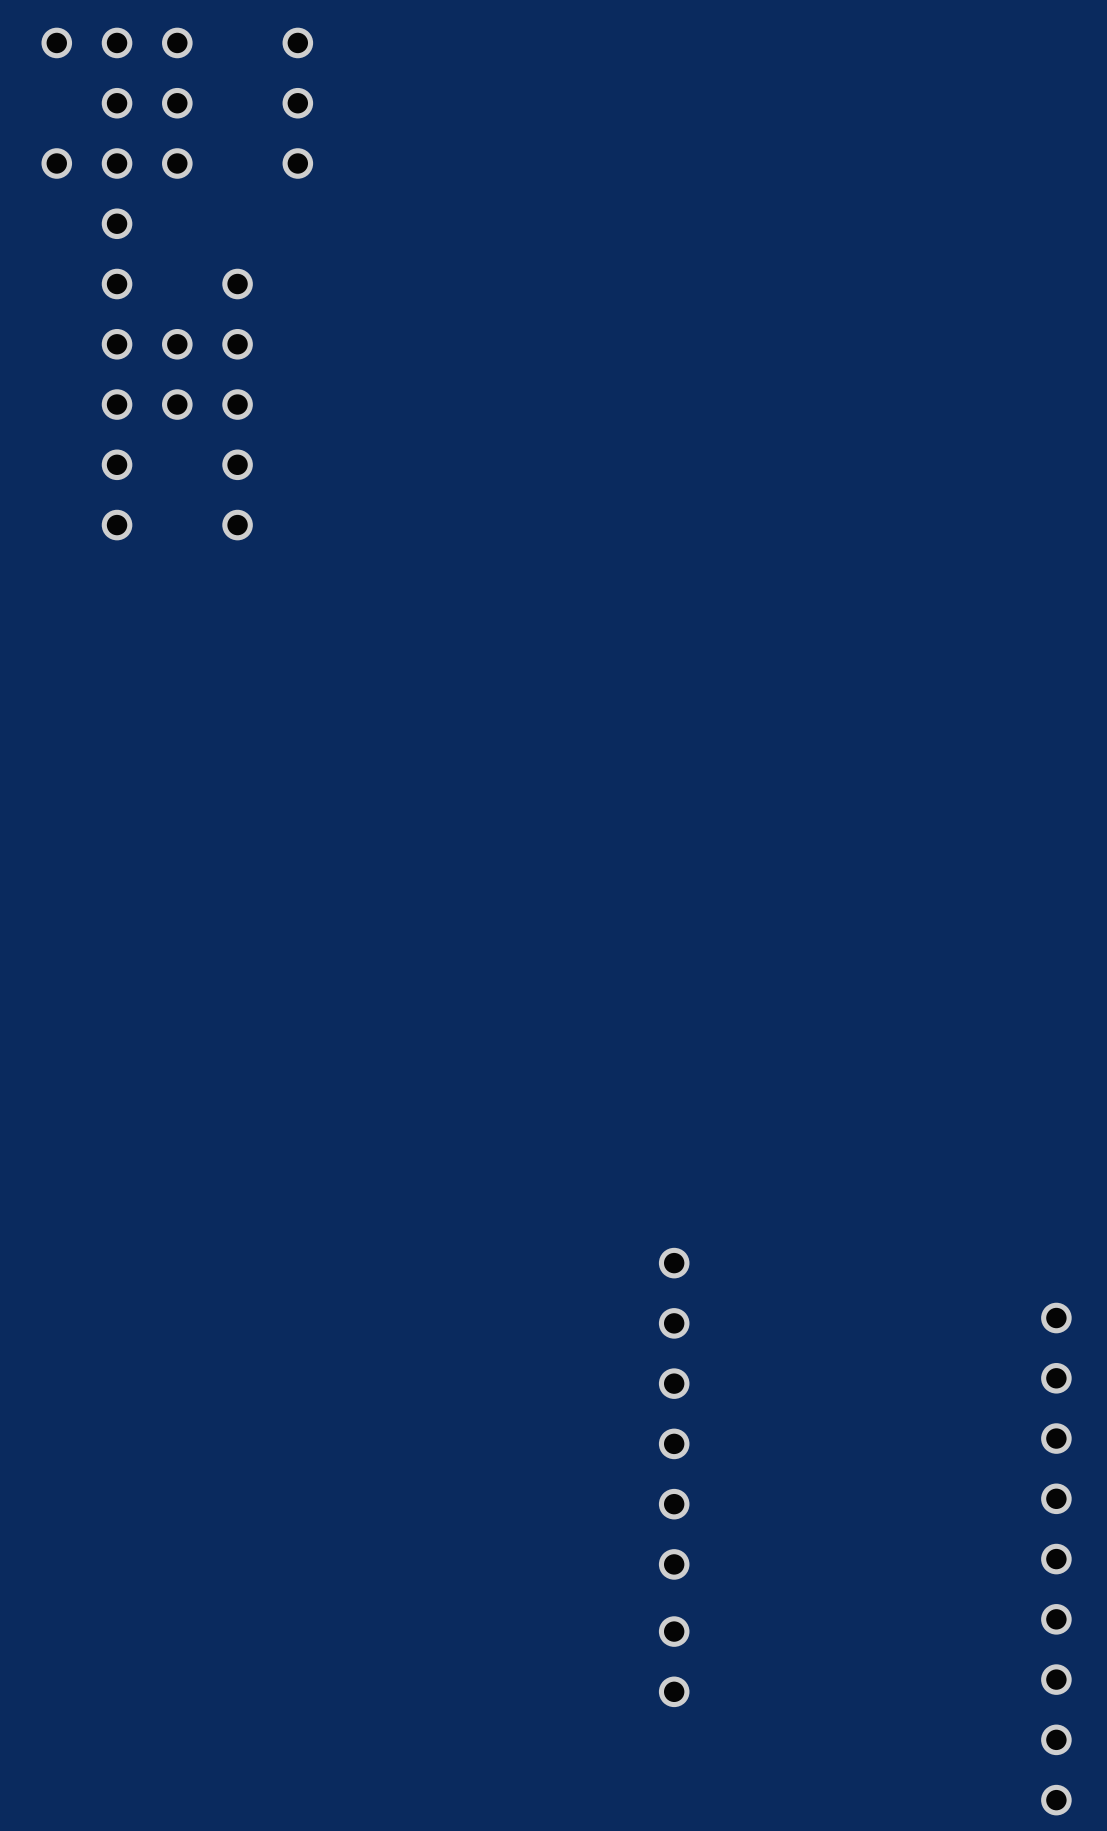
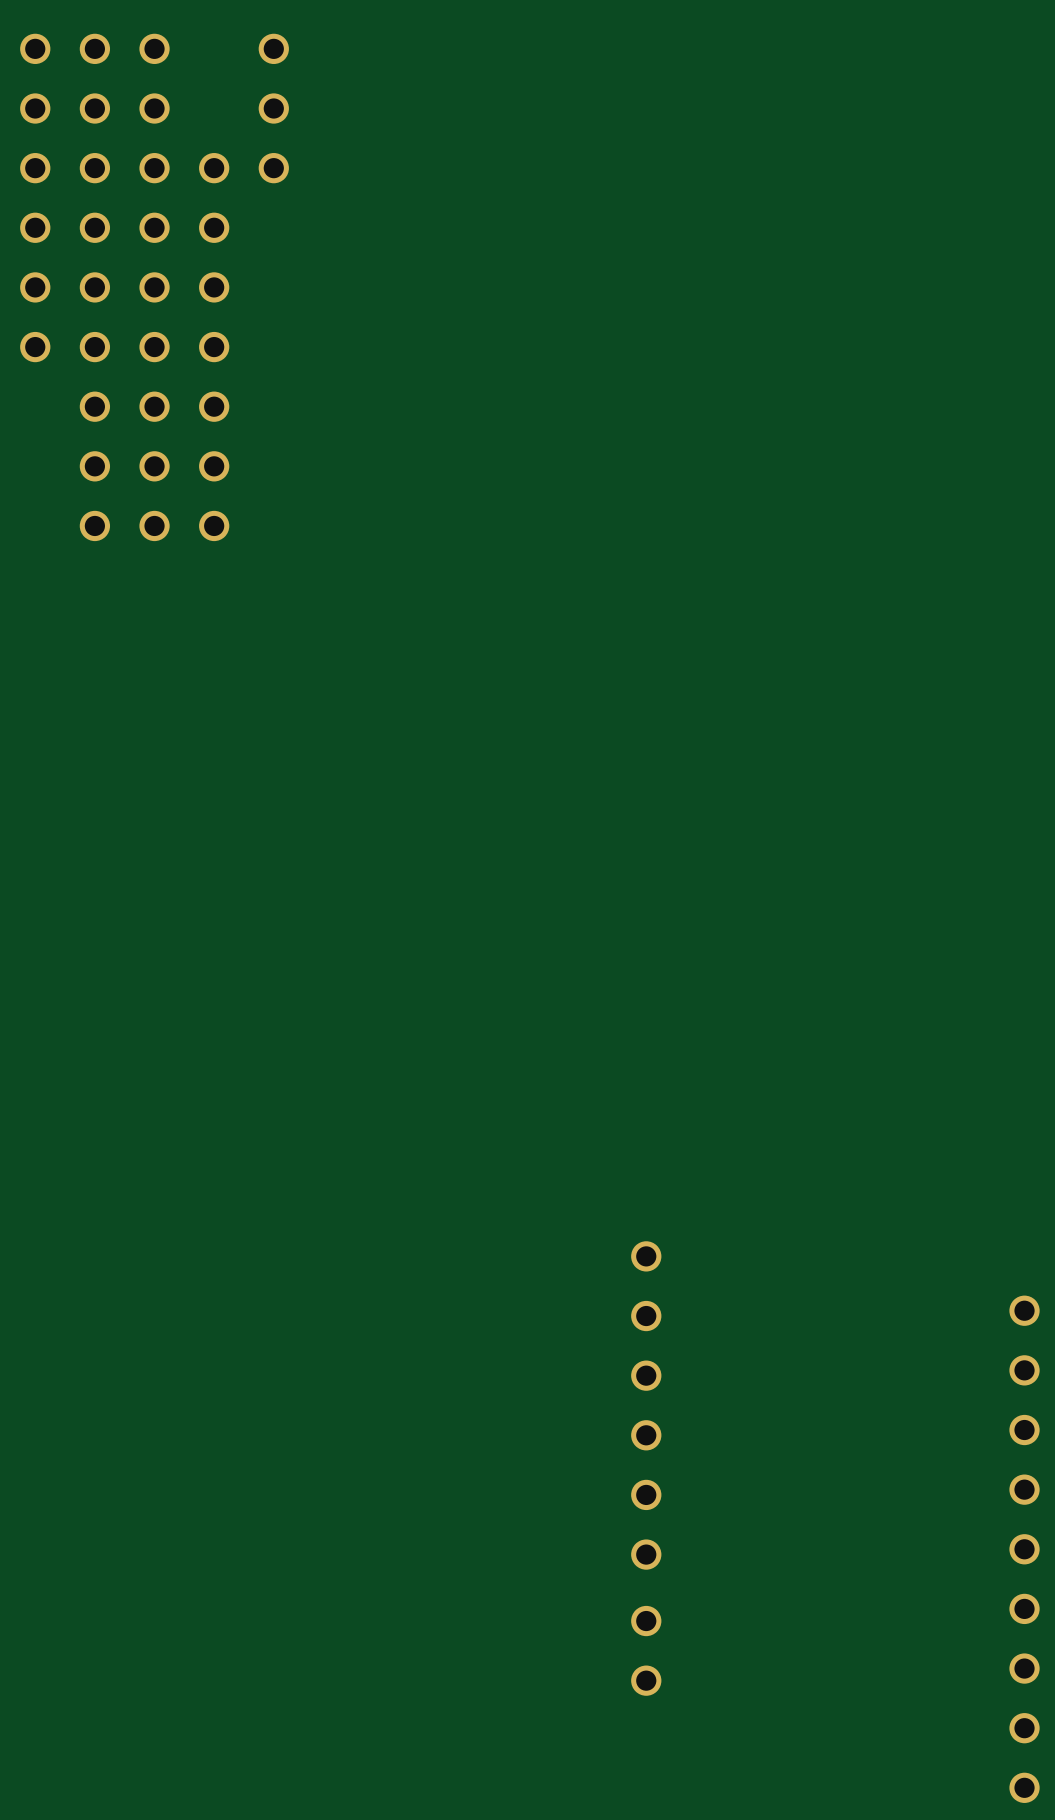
part: none -> (35, 108)
part: none -> (214, 168)
part: none -> (35, 227)
part: none -> (154, 227)
part: none -> (214, 227)
part: none -> (35, 287)
part: none -> (154, 287)
part: none -> (35, 347)
part: none -> (154, 466)
part: none -> (154, 525)

